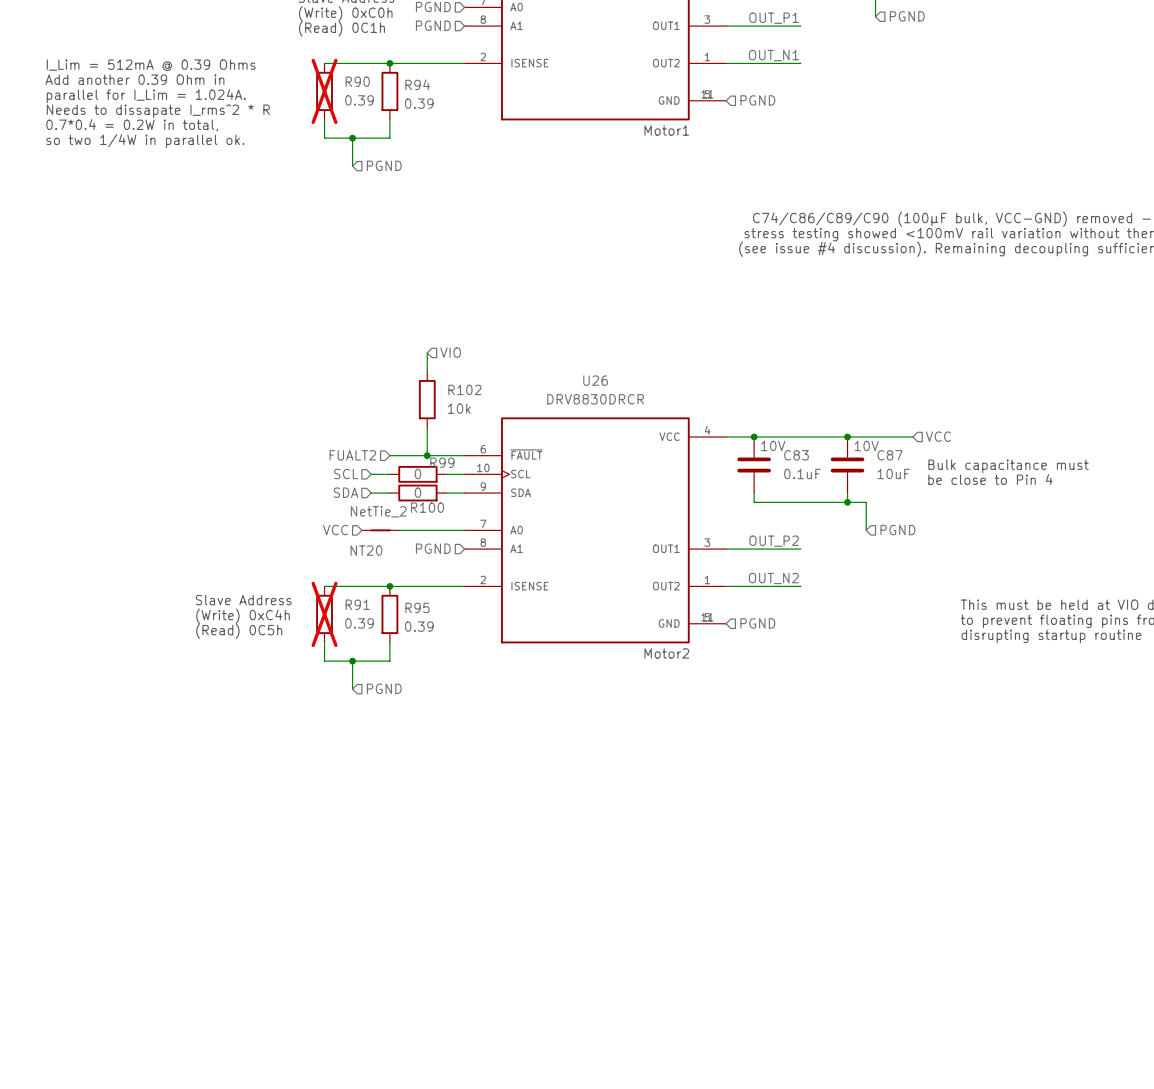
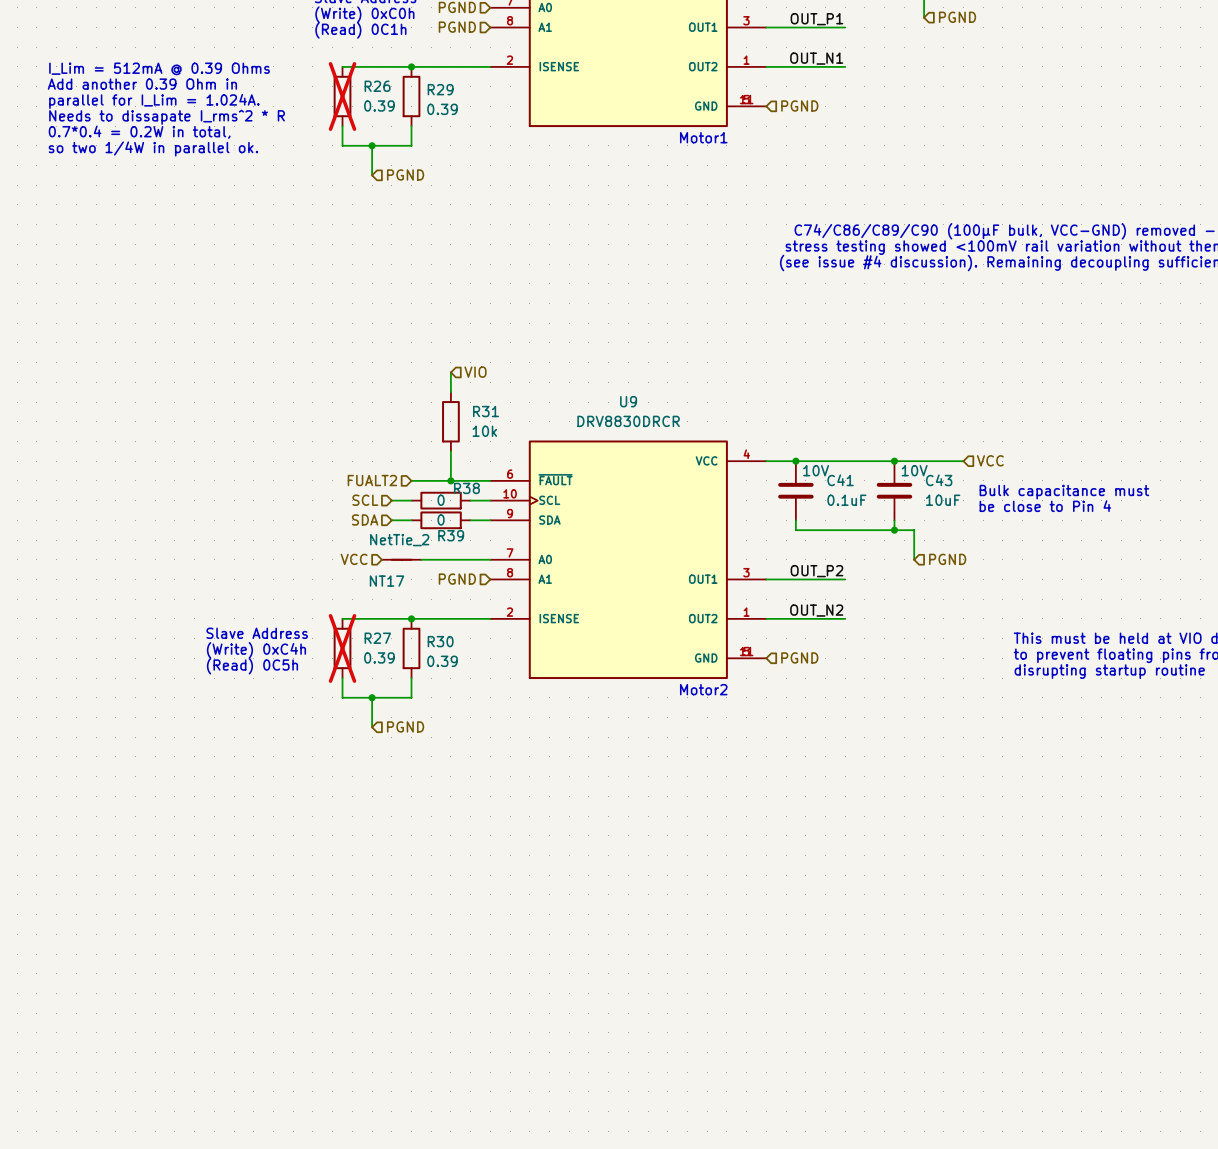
R90 name: R90 (357, 81) -> R26 (377, 86)
R94 name: R94 (417, 84) -> R29 (440, 89)
U26 name: U26 (595, 380) -> U9 (628, 401)
R102 name: R102 (464, 389) -> R31 (485, 411)
C83 name: C83 (796, 455) -> C41 (840, 480)
C87 name: C87 (890, 455) -> C43 (939, 480)
R99 name: R99 (442, 462) -> R38 (466, 488)
R100 name: R100 (427, 507) -> R39 (451, 535)
NT20 name: NT20 (366, 550) -> NT17 (386, 581)
R91 name: R91 (357, 604) -> R27 (377, 638)
R95 name: R95 (417, 607) -> R30 (440, 641)

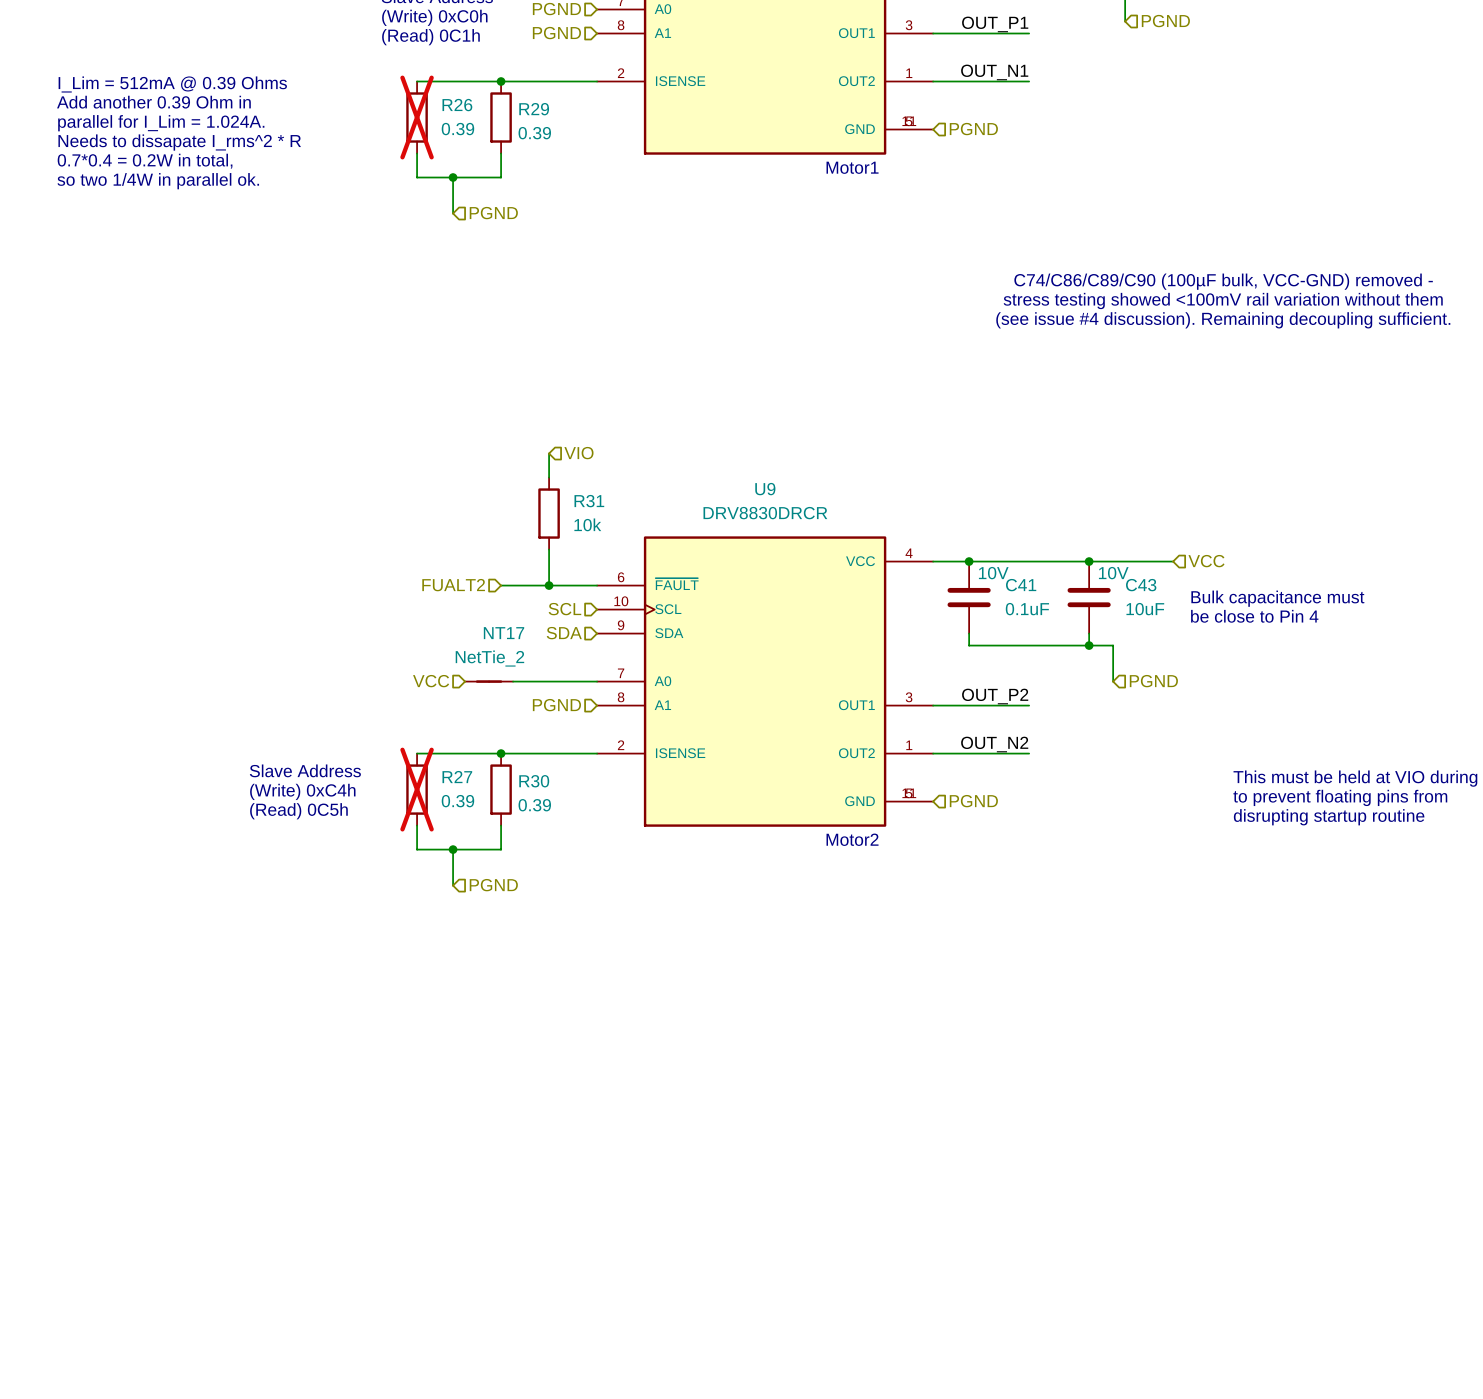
hierarchical label position: SCL (365, 500) -> SCL (564, 609)
wire: (391, 500) (411, 500) -> none
R38: 0 (441, 500) -> none
wire: (470, 500) (490, 500) -> none
hierarchical label position: SDA (365, 519) -> SDA (564, 633)
wire: (391, 520) (411, 520) -> none
R39: 0 (441, 520) -> none
wire: (470, 520) (490, 520) -> none
NT17 name position: NT17 (386, 581) -> NT17 (504, 633)

